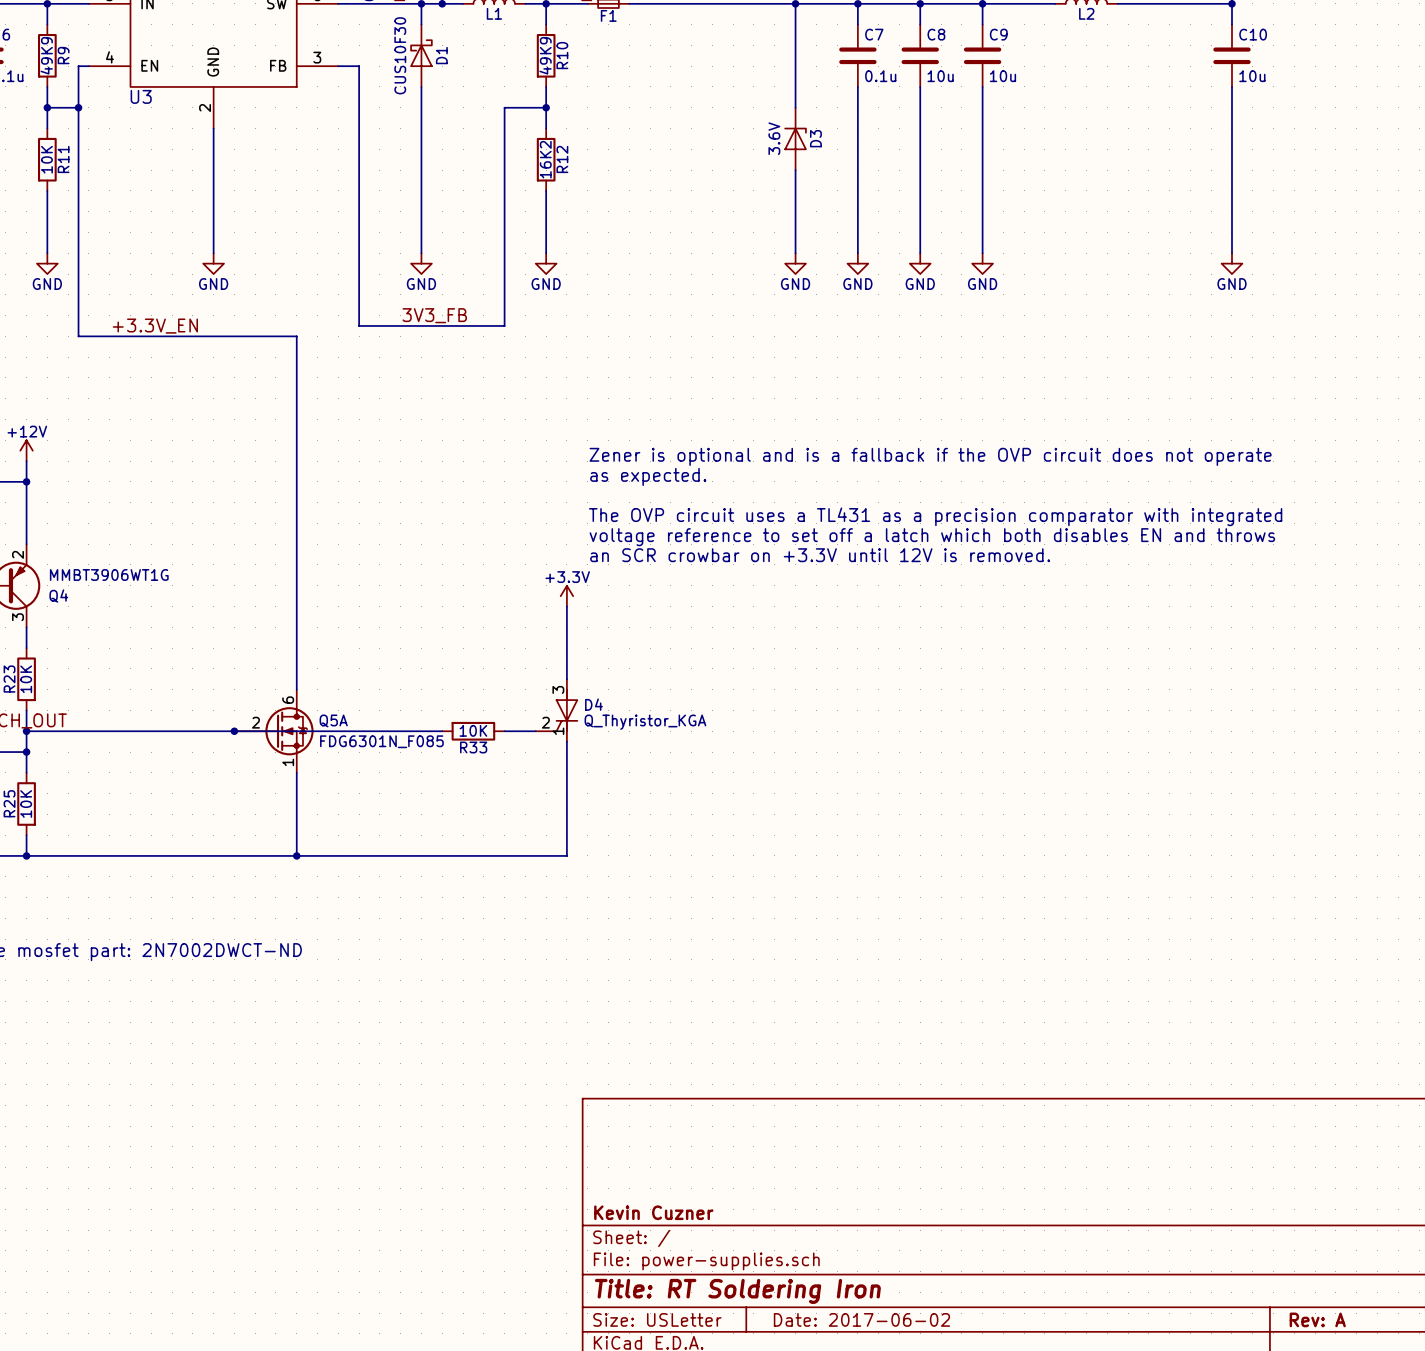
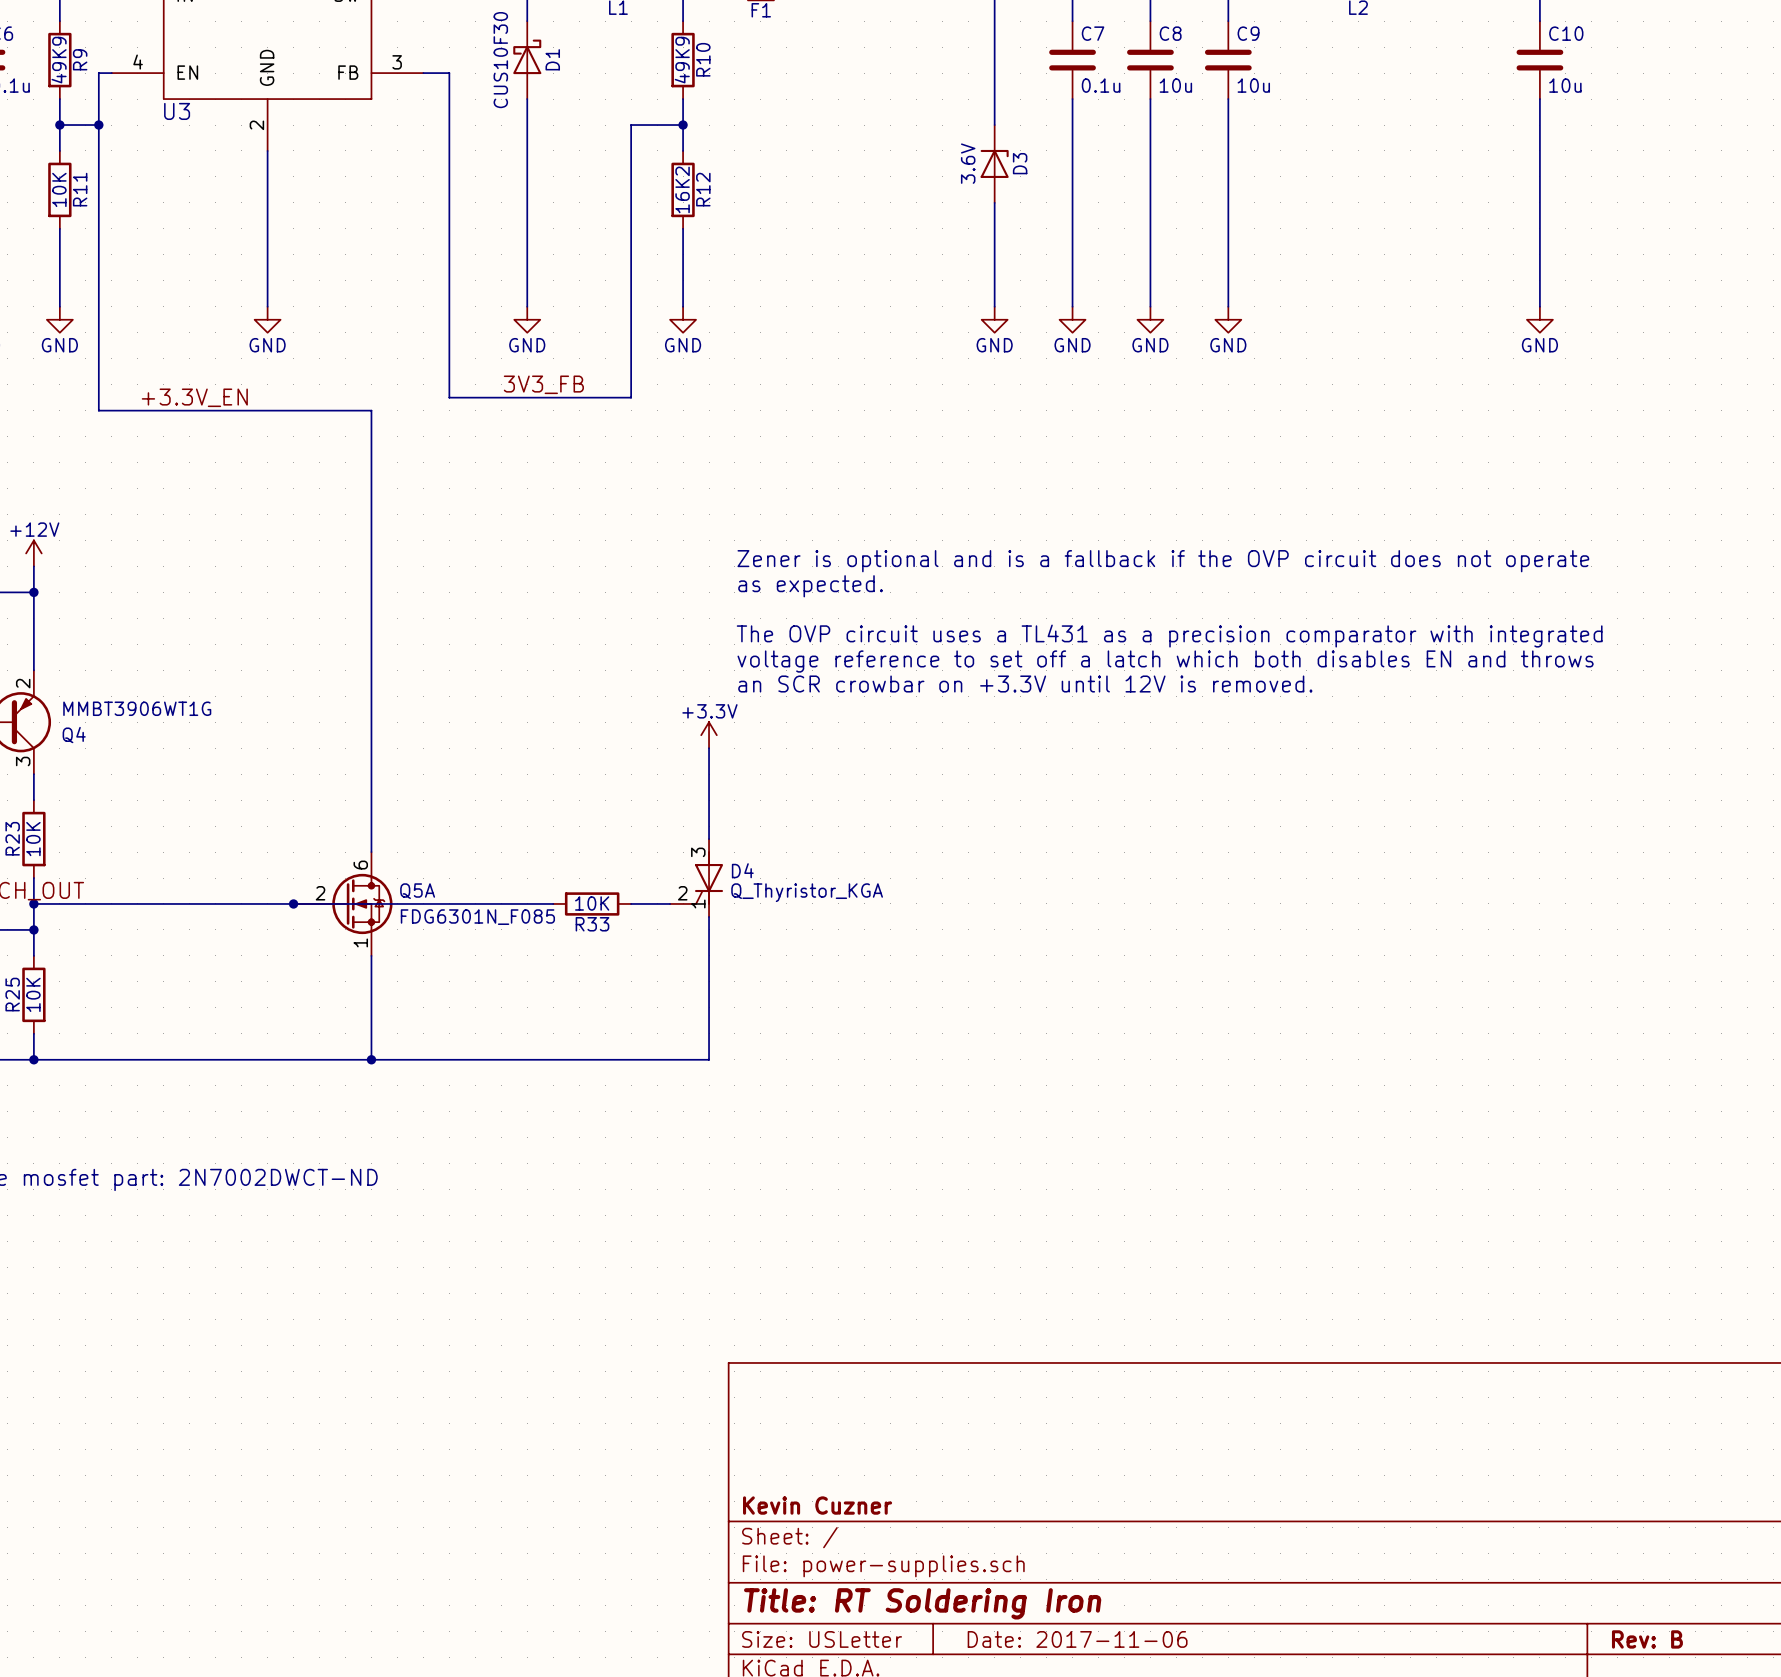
title block: Date: 2017-06-02 (861, 1319) -> Date: 2017-11-06 (1077, 1639)
title block: Rev: A (1317, 1319) -> Rev: B (1647, 1639)

